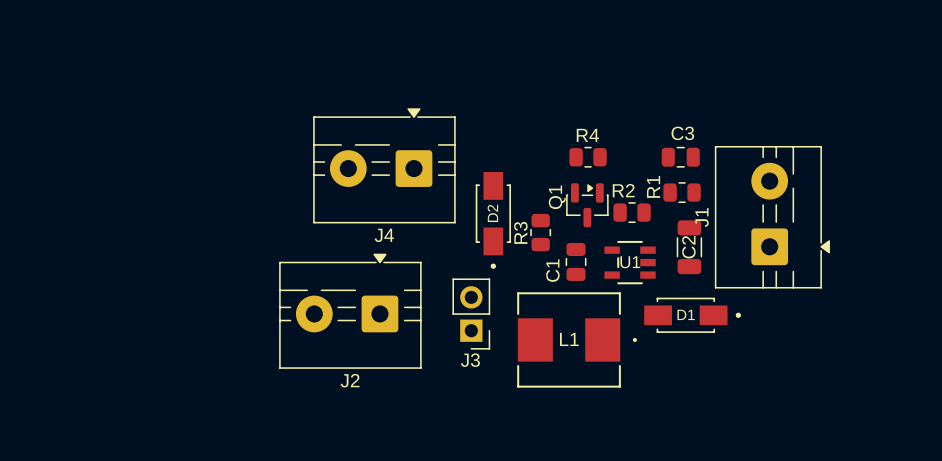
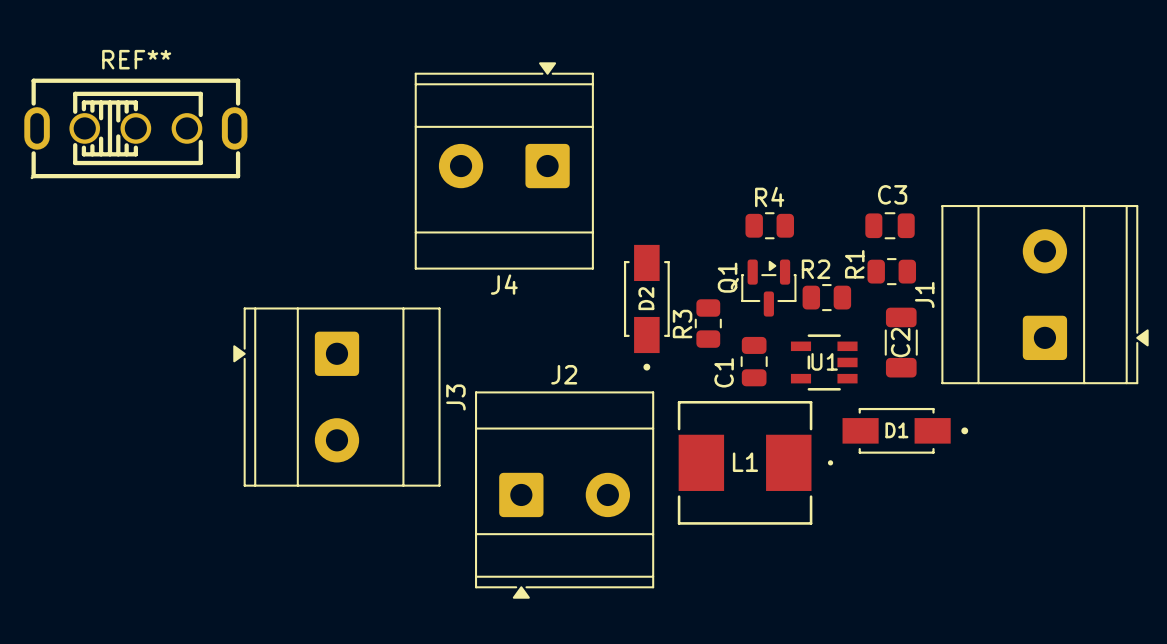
REF**: none -> (135, 128)
J4 footprint: [313, 108, 456, 224] -> [414, 62, 594, 270]
J1 footprint: [714, 145, 830, 289] -> [941, 205, 1149, 385]
J2 footprint: [279, 253, 422, 369] -> [475, 391, 655, 599]
J3 footprint: [452, 278, 491, 350] -> [233, 307, 441, 487]
J3 name position: J3 (470, 360) -> J3 (455, 397)
J2 name position: J2 (350, 380) -> J2 (564, 374)

